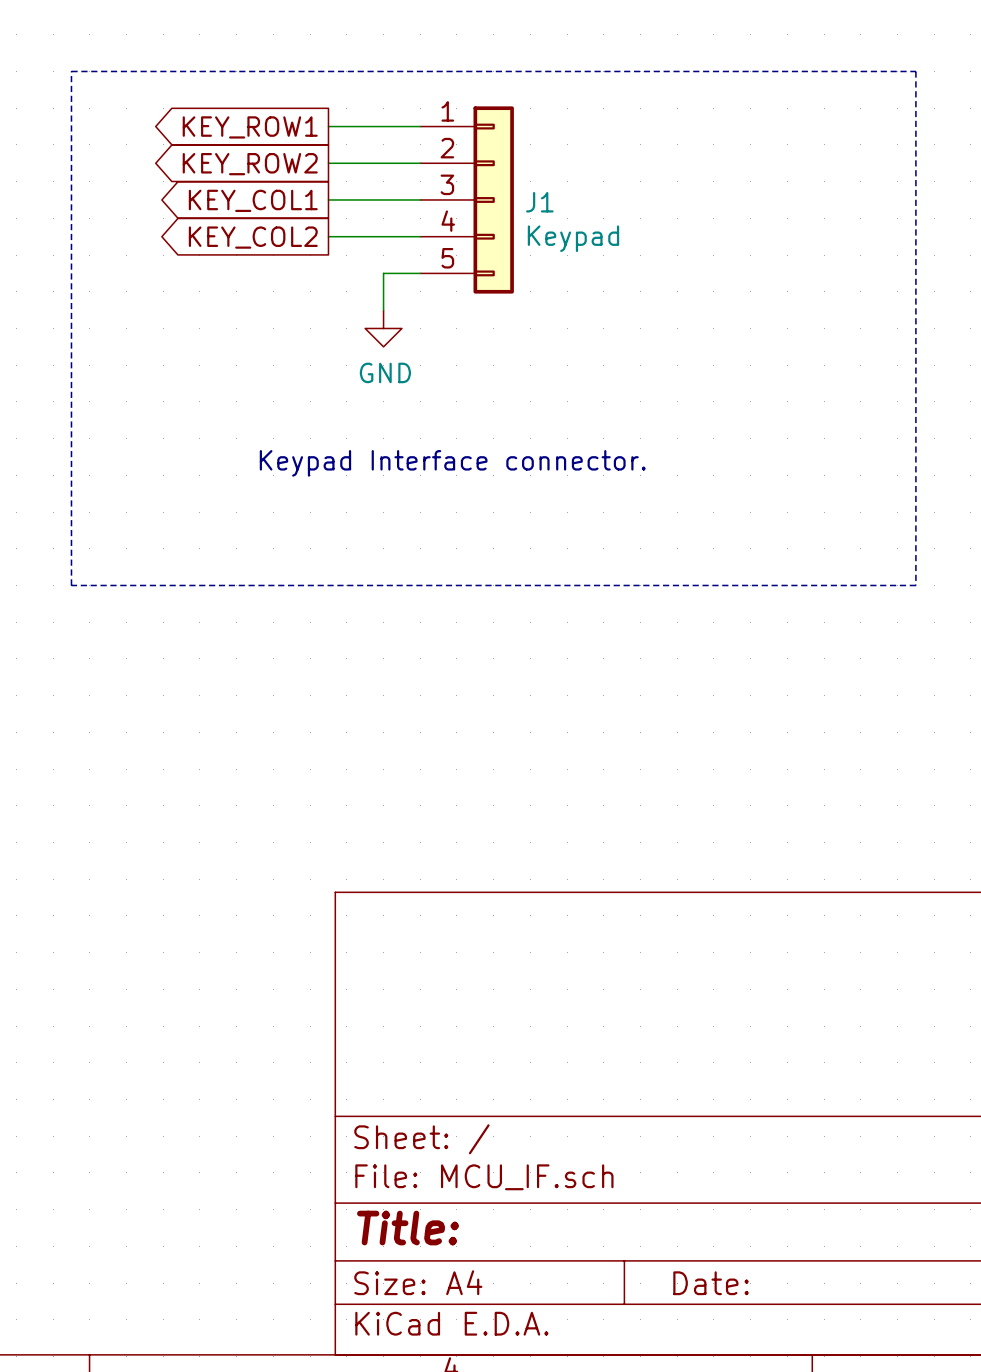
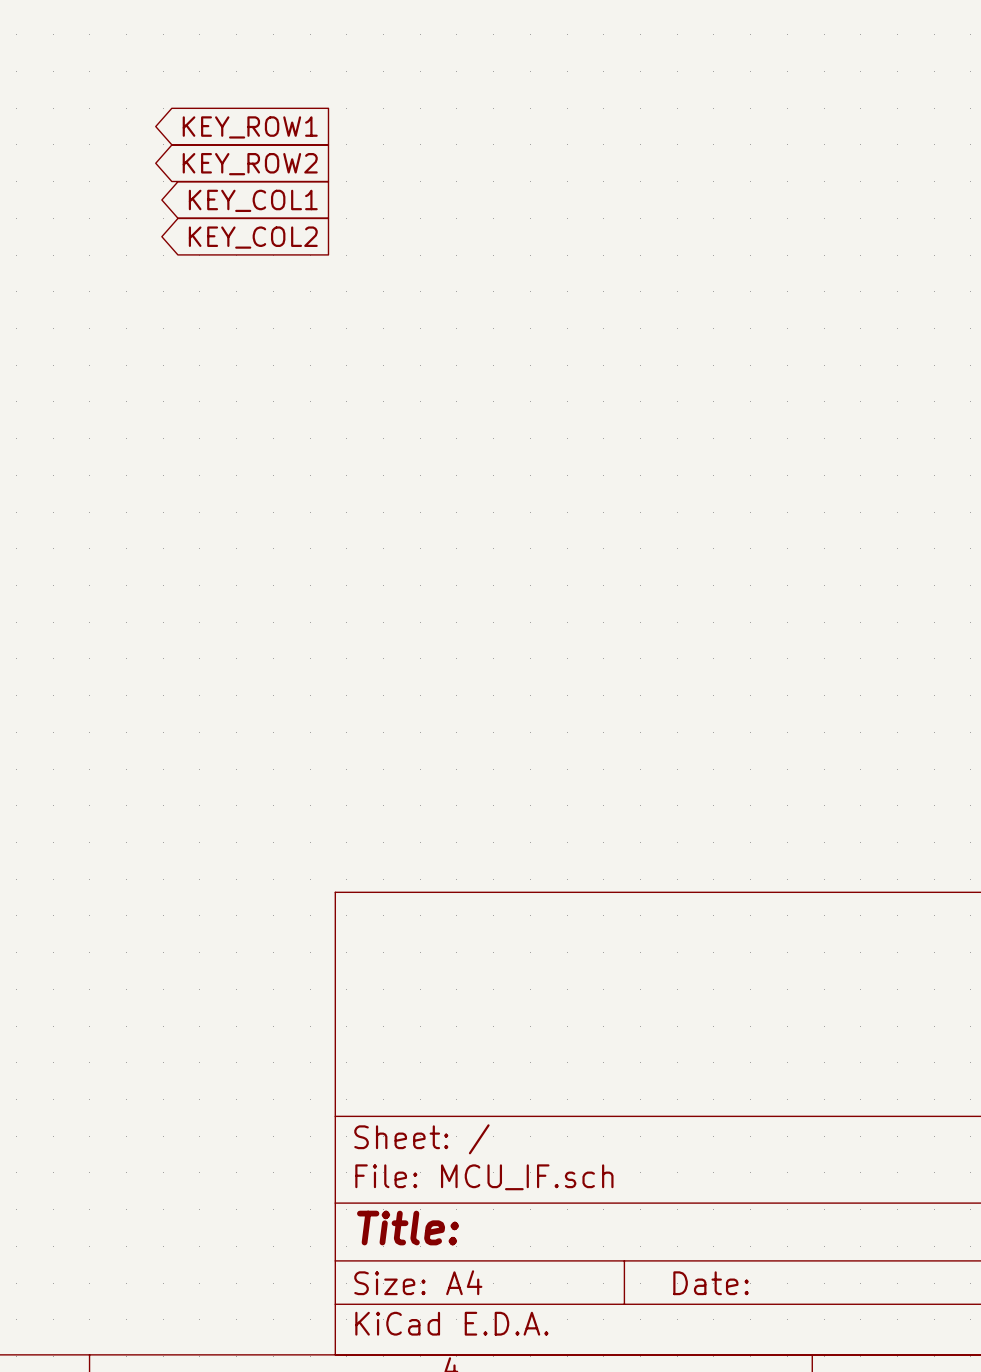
line: (71, 71) (71, 585) (915, 585) (915, 71) (71, 71) -> none
wire: (328, 126) (420, 126) -> none
wire: (328, 163) (420, 163) -> none
wire: (328, 199) (420, 199) -> none
J1: Keypad (467, 199) -> none
wire: (328, 236) (420, 236) -> none
wire: (420, 273) (383, 273) (383, 310) -> none
power symbol: GND (383, 328) -> none
text: Keypad Interface connector. (452, 463) -> none

